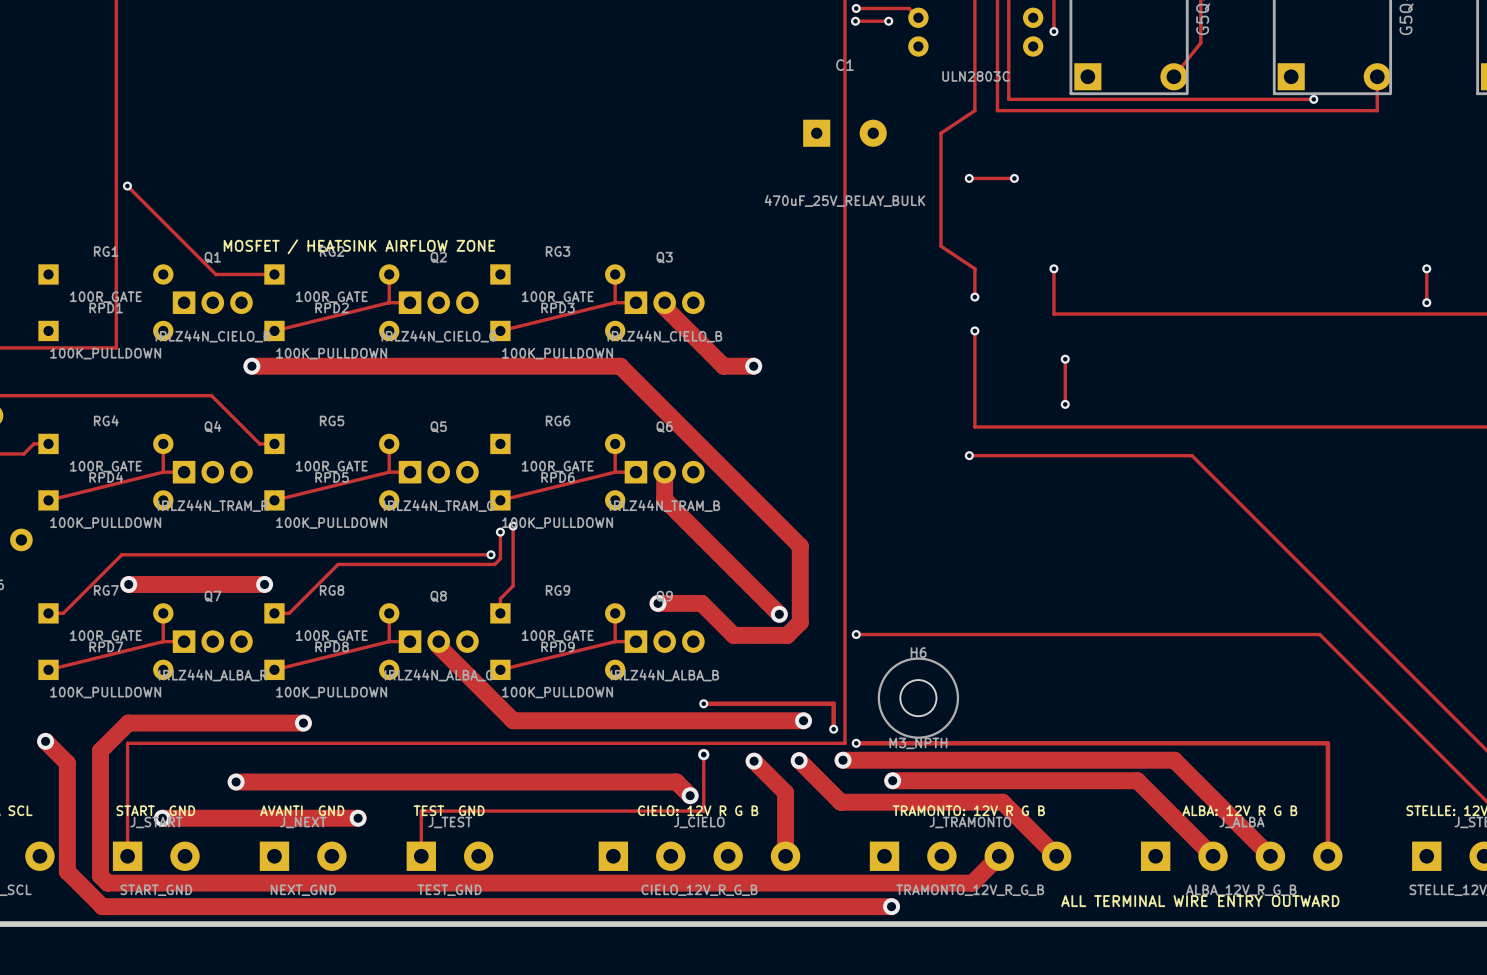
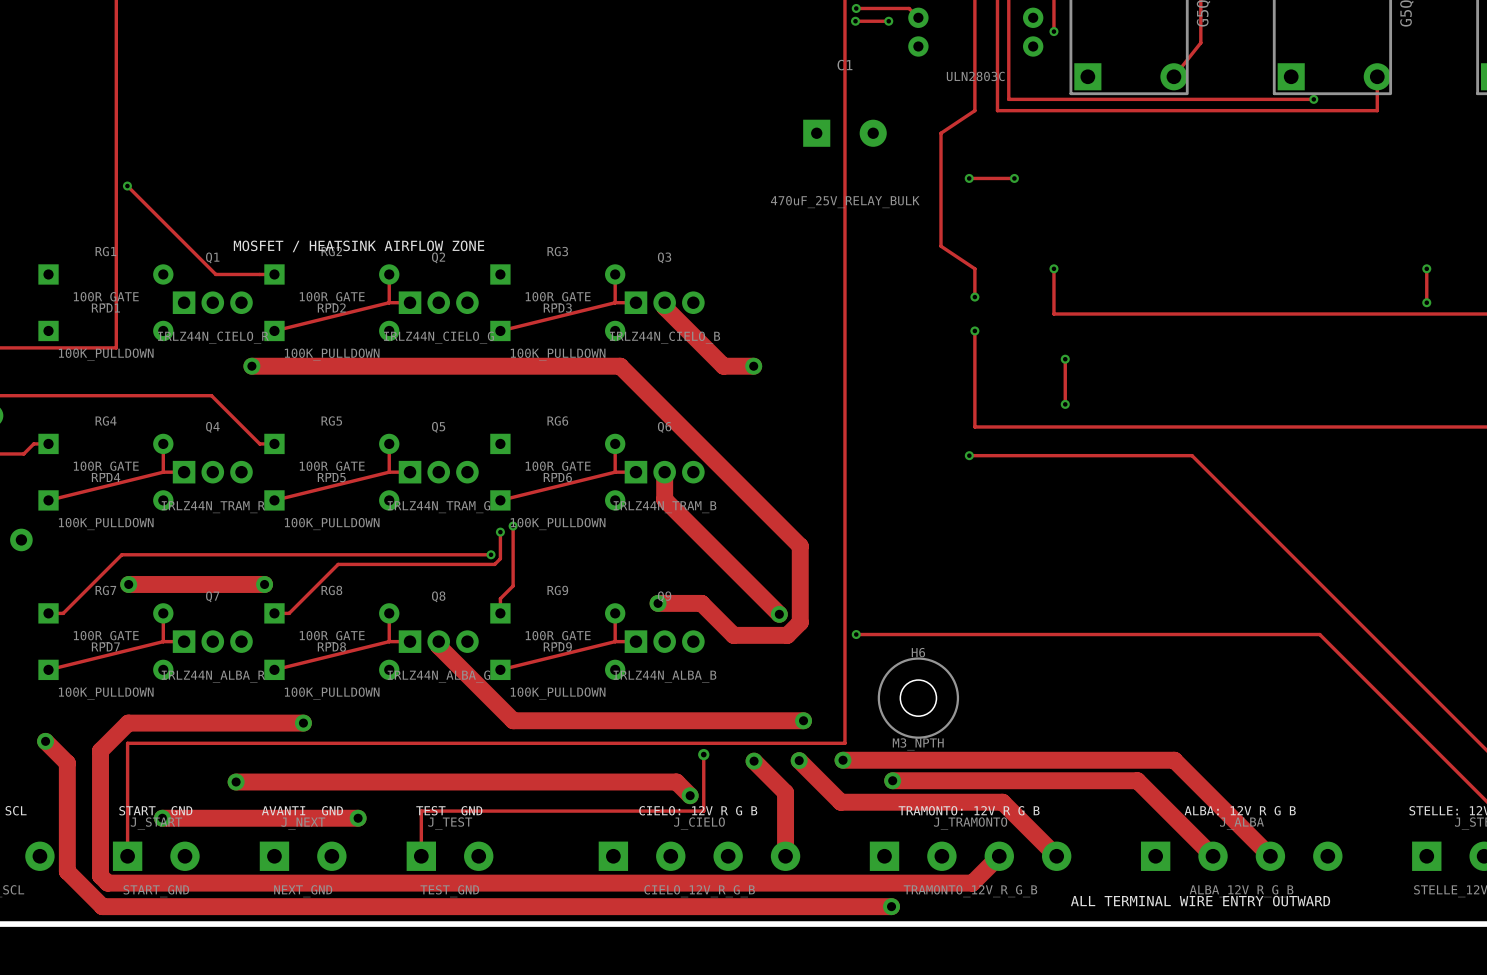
track: (703, 703) (833, 703) (833, 729) -> none
via: (703, 703) -> none
via: (833, 729) -> none
track: (856, 743) (1327, 743) (1327, 856) -> none
via: (856, 743) -> none

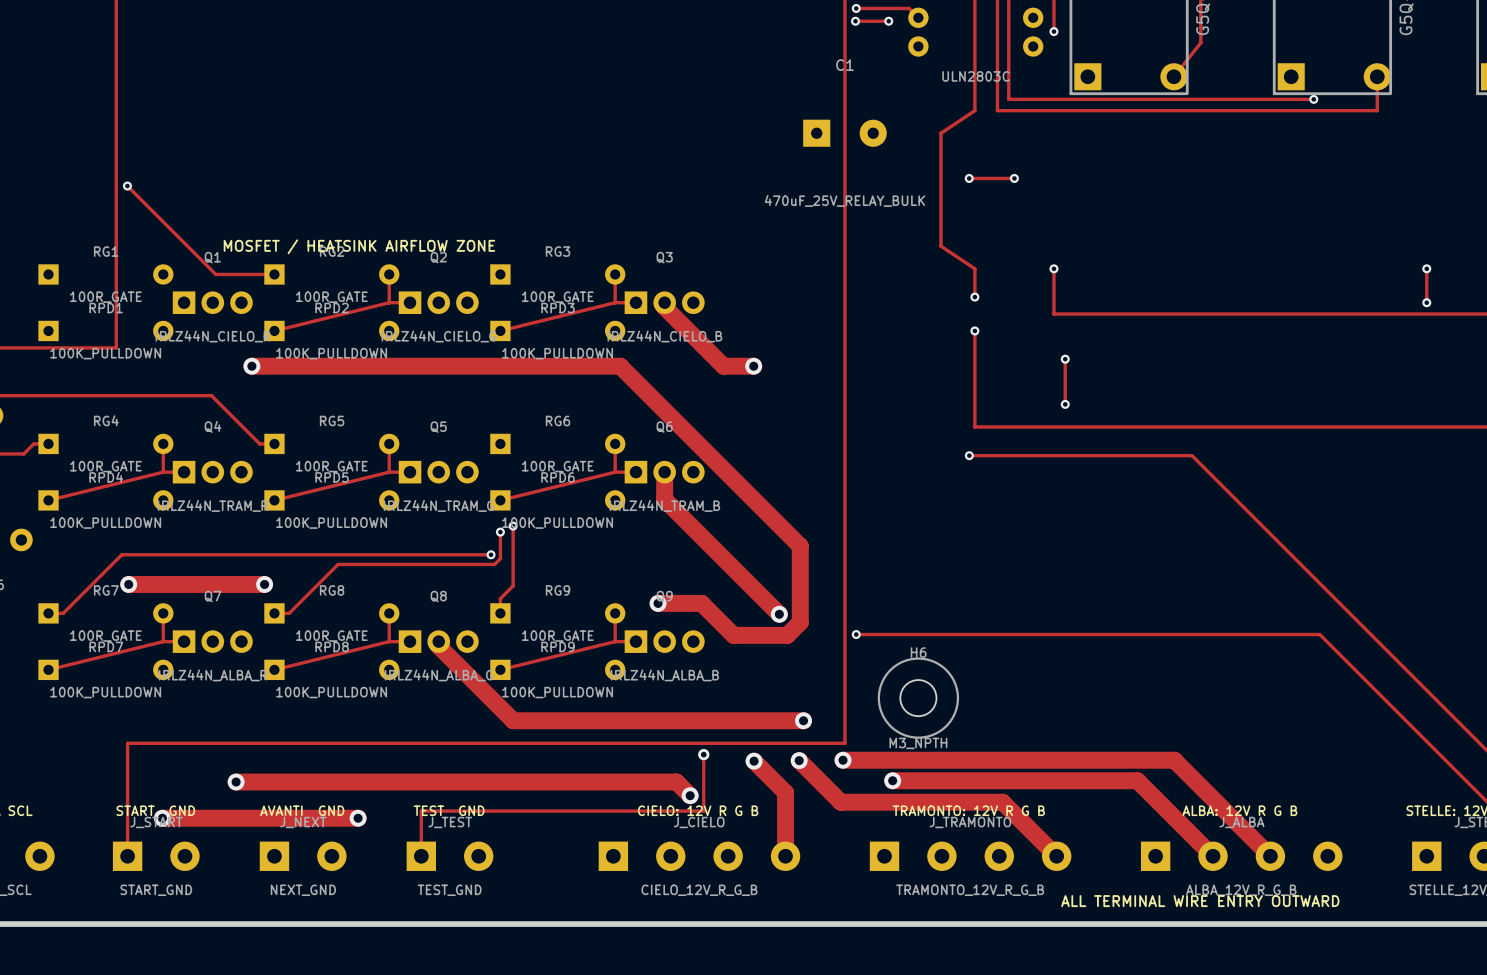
track: (303, 723) (128, 723) (100, 750) (100, 875) (107, 883) (972, 883) (999, 856) -> none
via: (303, 723) -> none
track: (45, 741) (67, 763) (67, 871) (102, 906) (891, 906) -> none
via: (45, 741) -> none
via: (891, 906) -> none

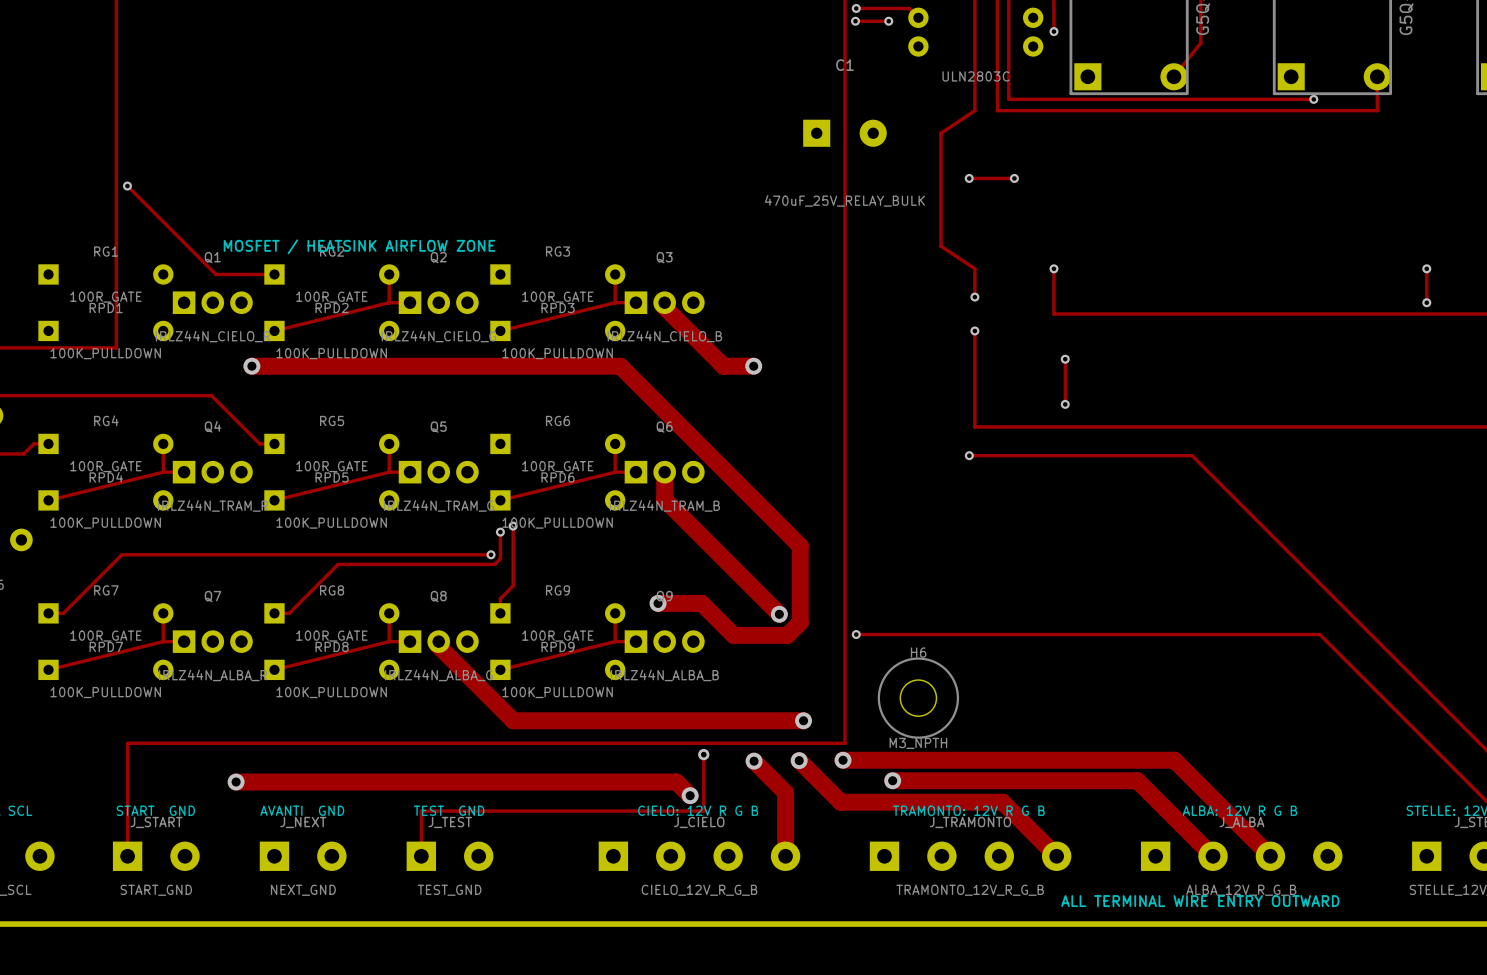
track: (128, 584) (264, 584) -> none
via: (128, 584) -> none
via: (264, 584) -> none
track: (162, 818) (358, 818) -> none
via: (162, 818) -> none
via: (358, 818) -> none

